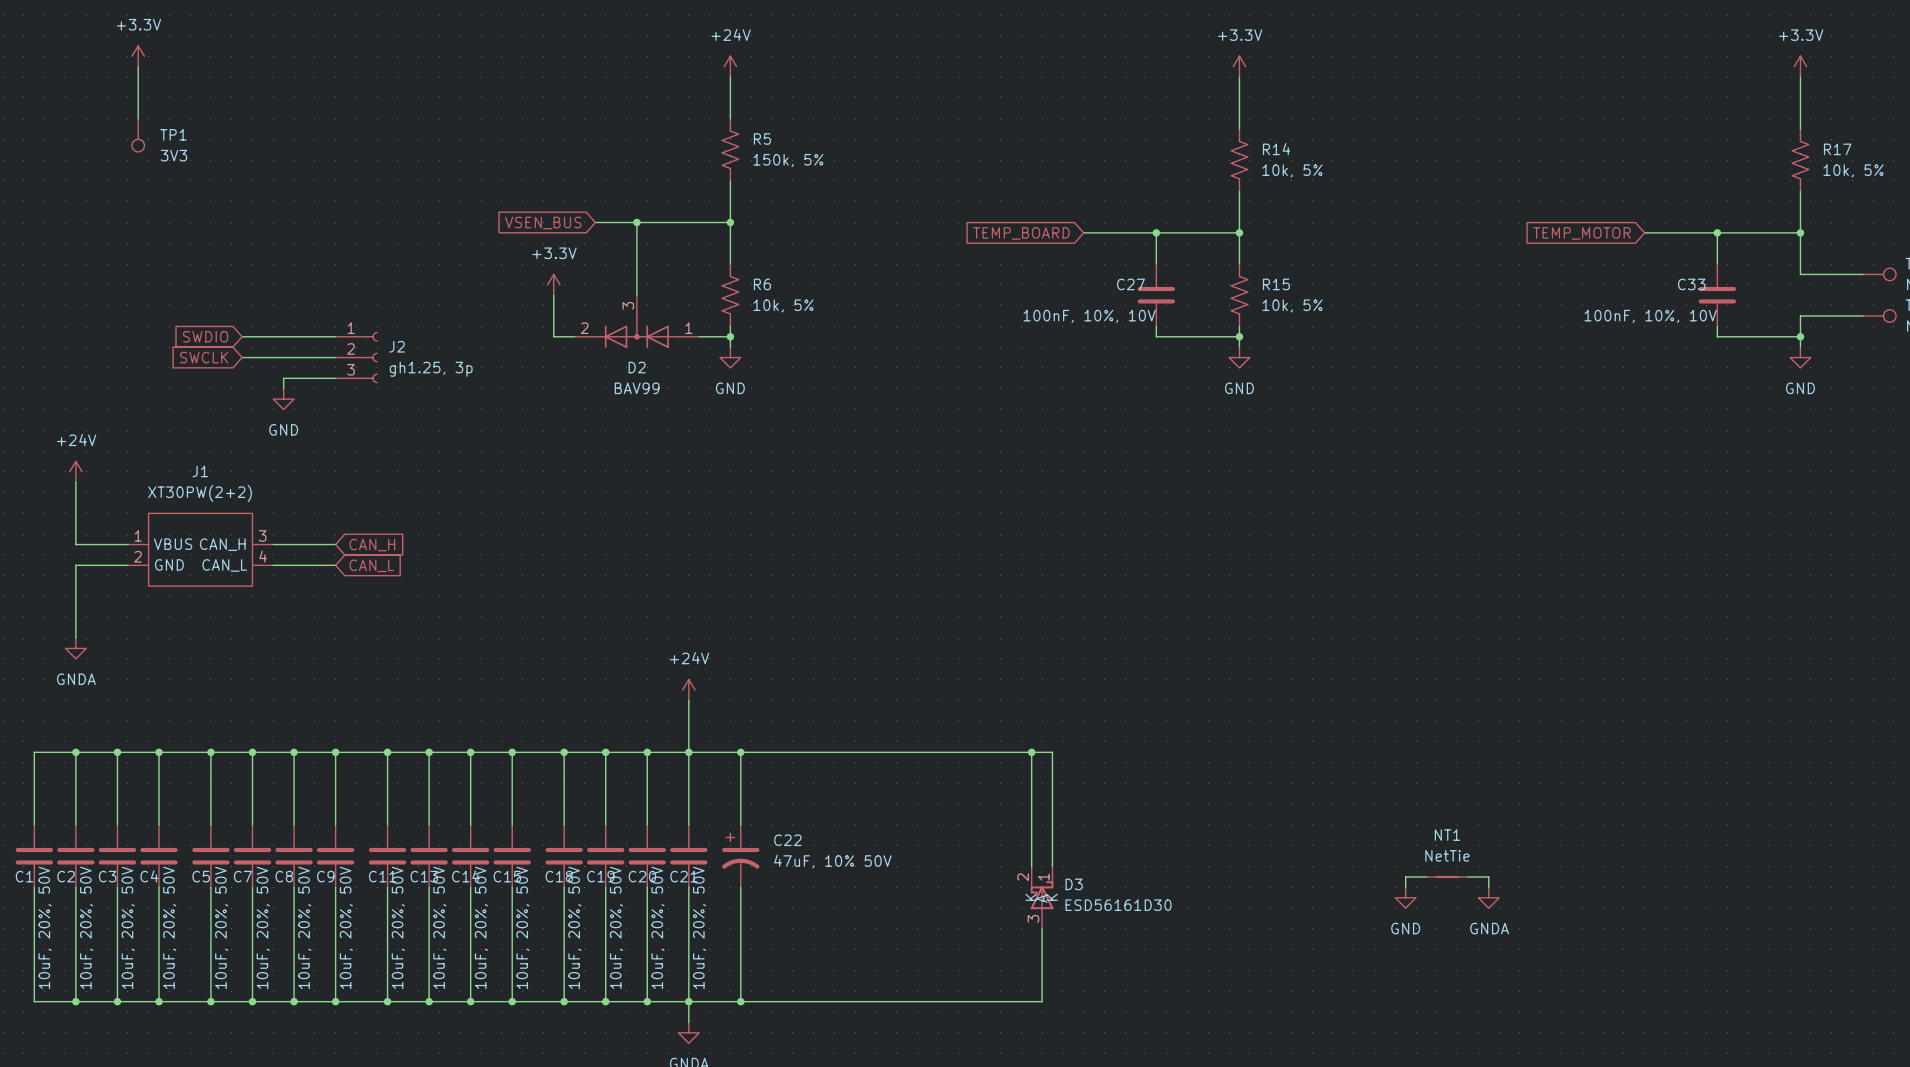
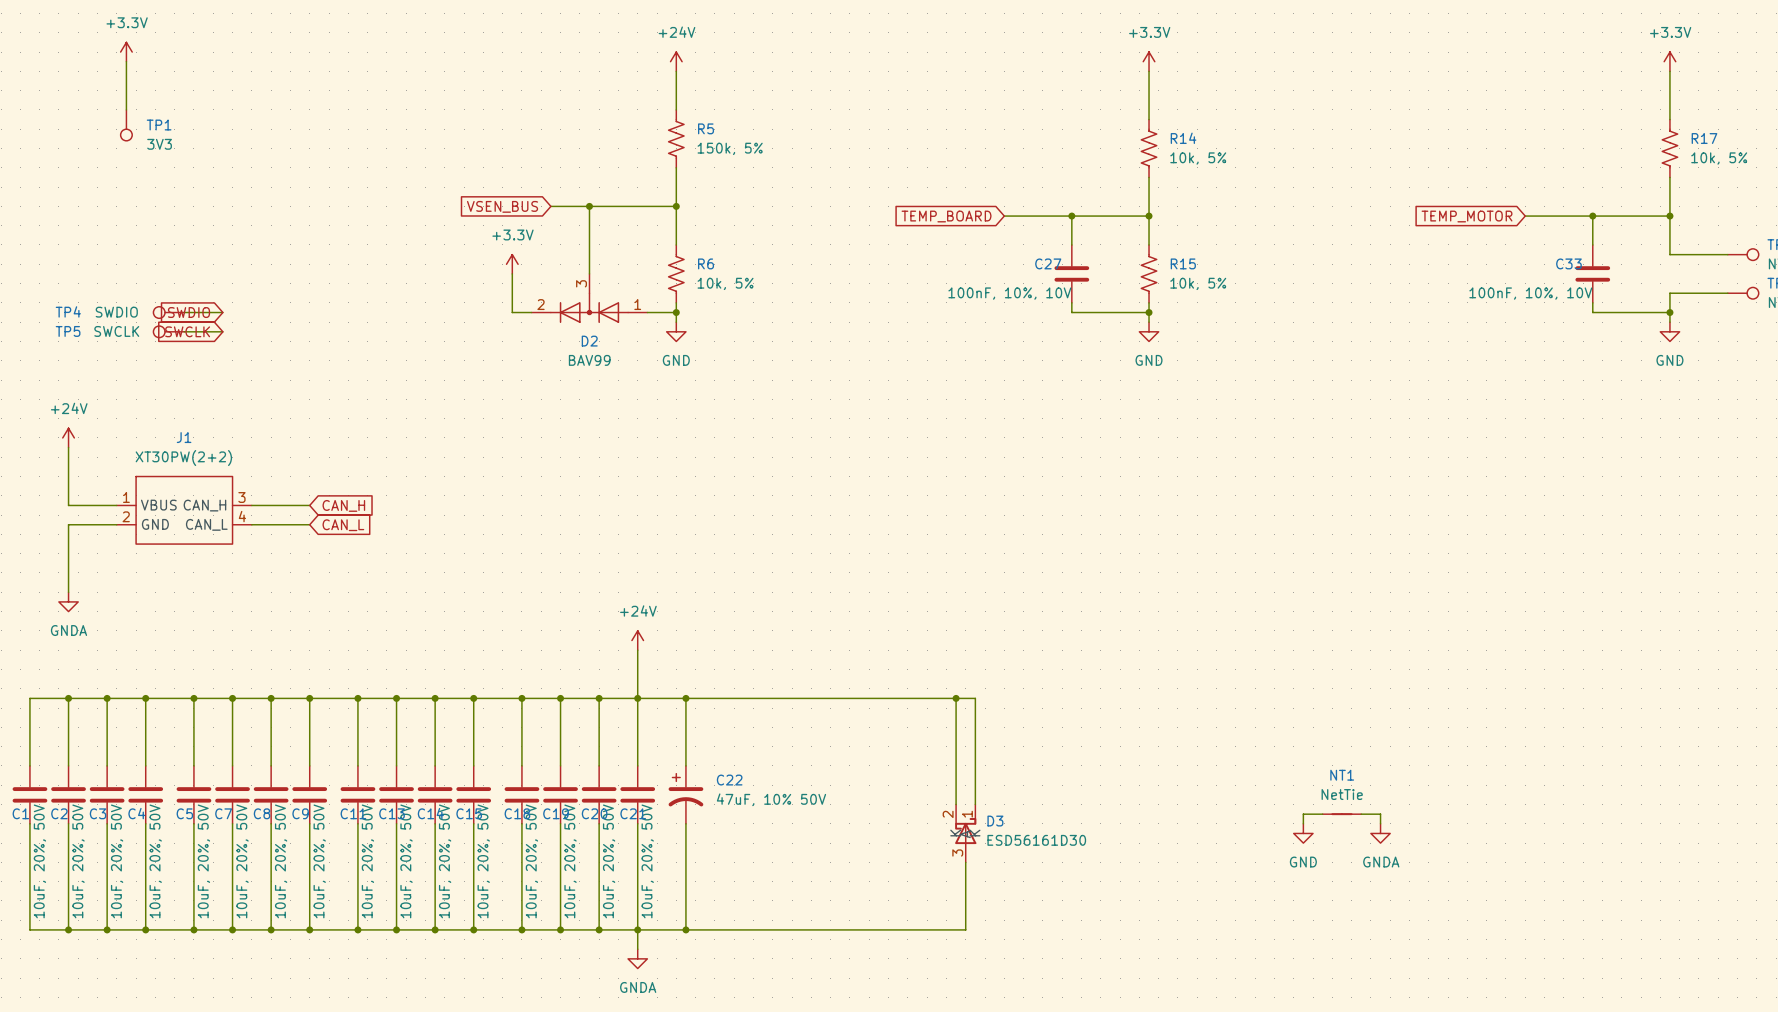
TP4: none -> SWDIO (168, 312)
wire: (242, 336) (335, 336) -> (222, 312) (184, 312)
TP5: none -> SWCLK (168, 331)
wire: (242, 357) (335, 357) -> (222, 331) (184, 331)
J2: gh1.25, 3p (356, 357) -> none
wire: (335, 378) (283, 378) (283, 388) -> none
power symbol: GND (283, 399) -> none

